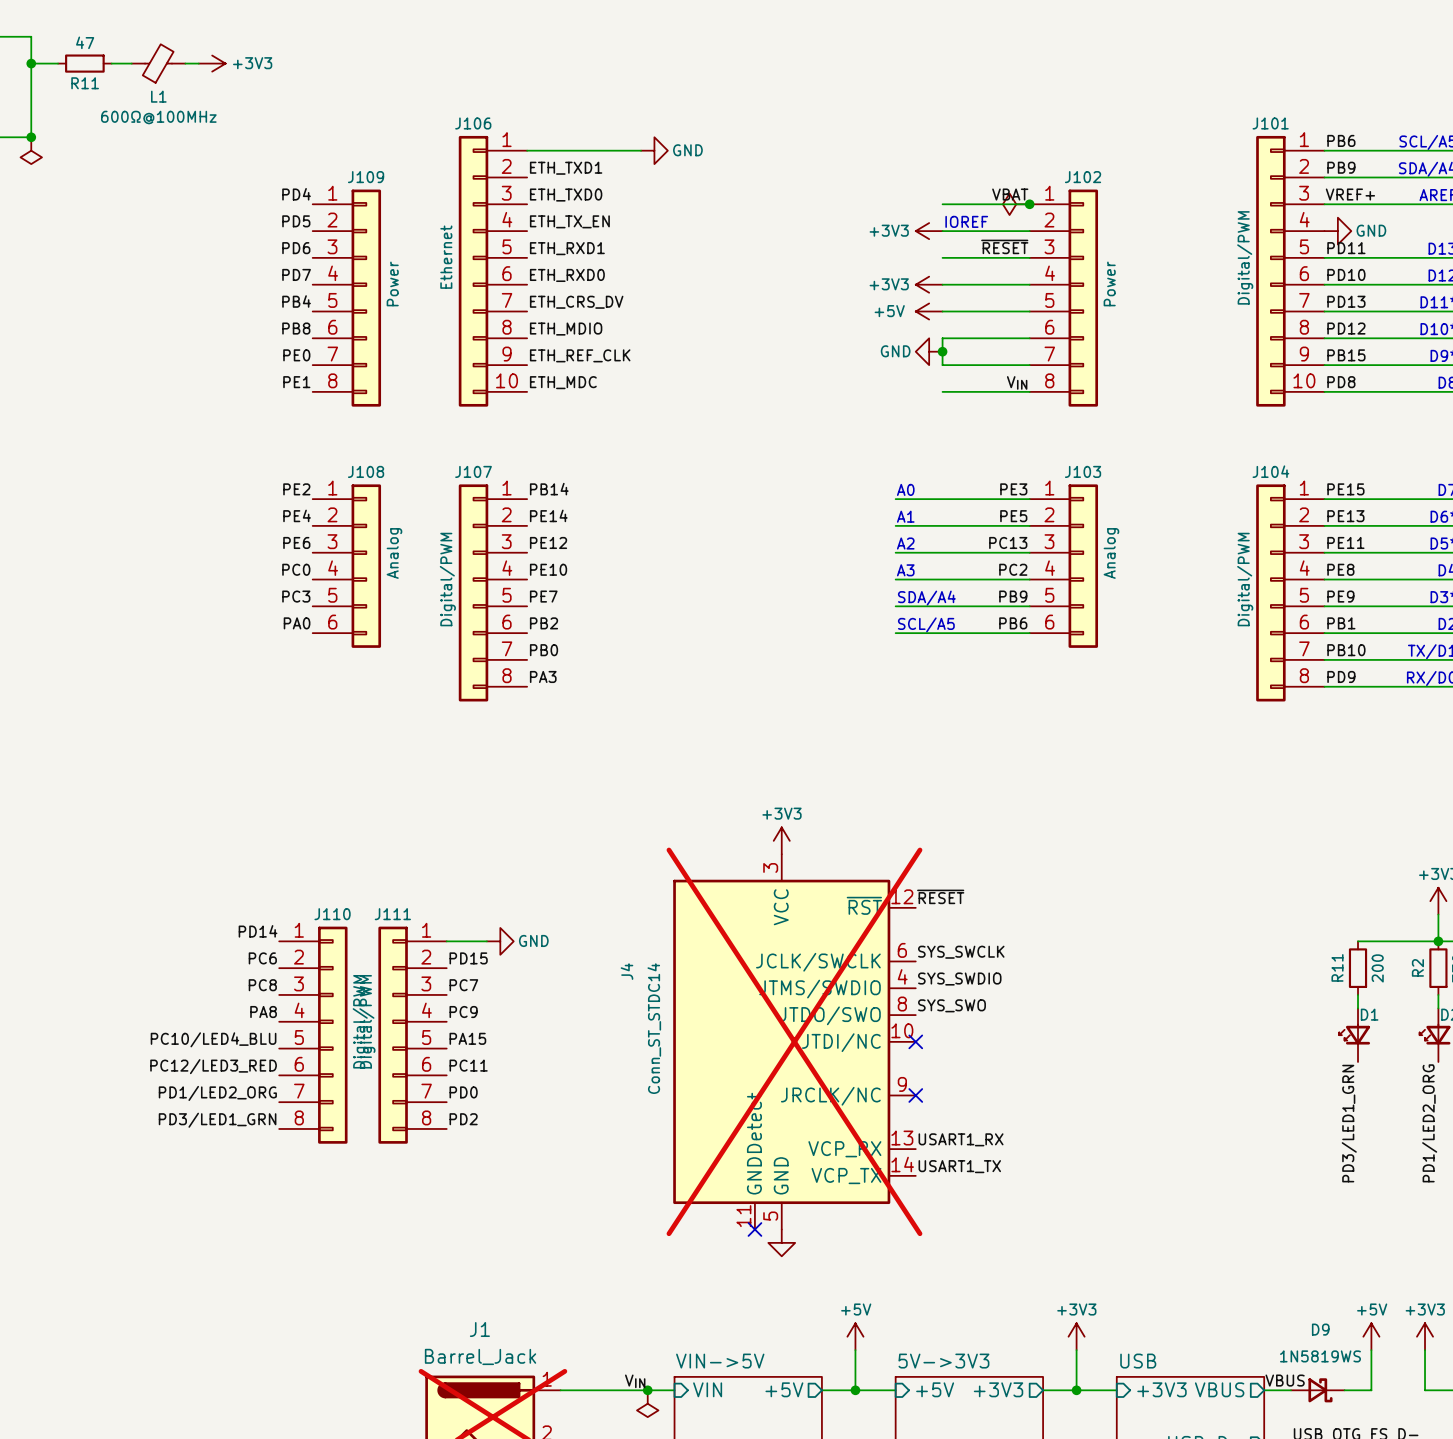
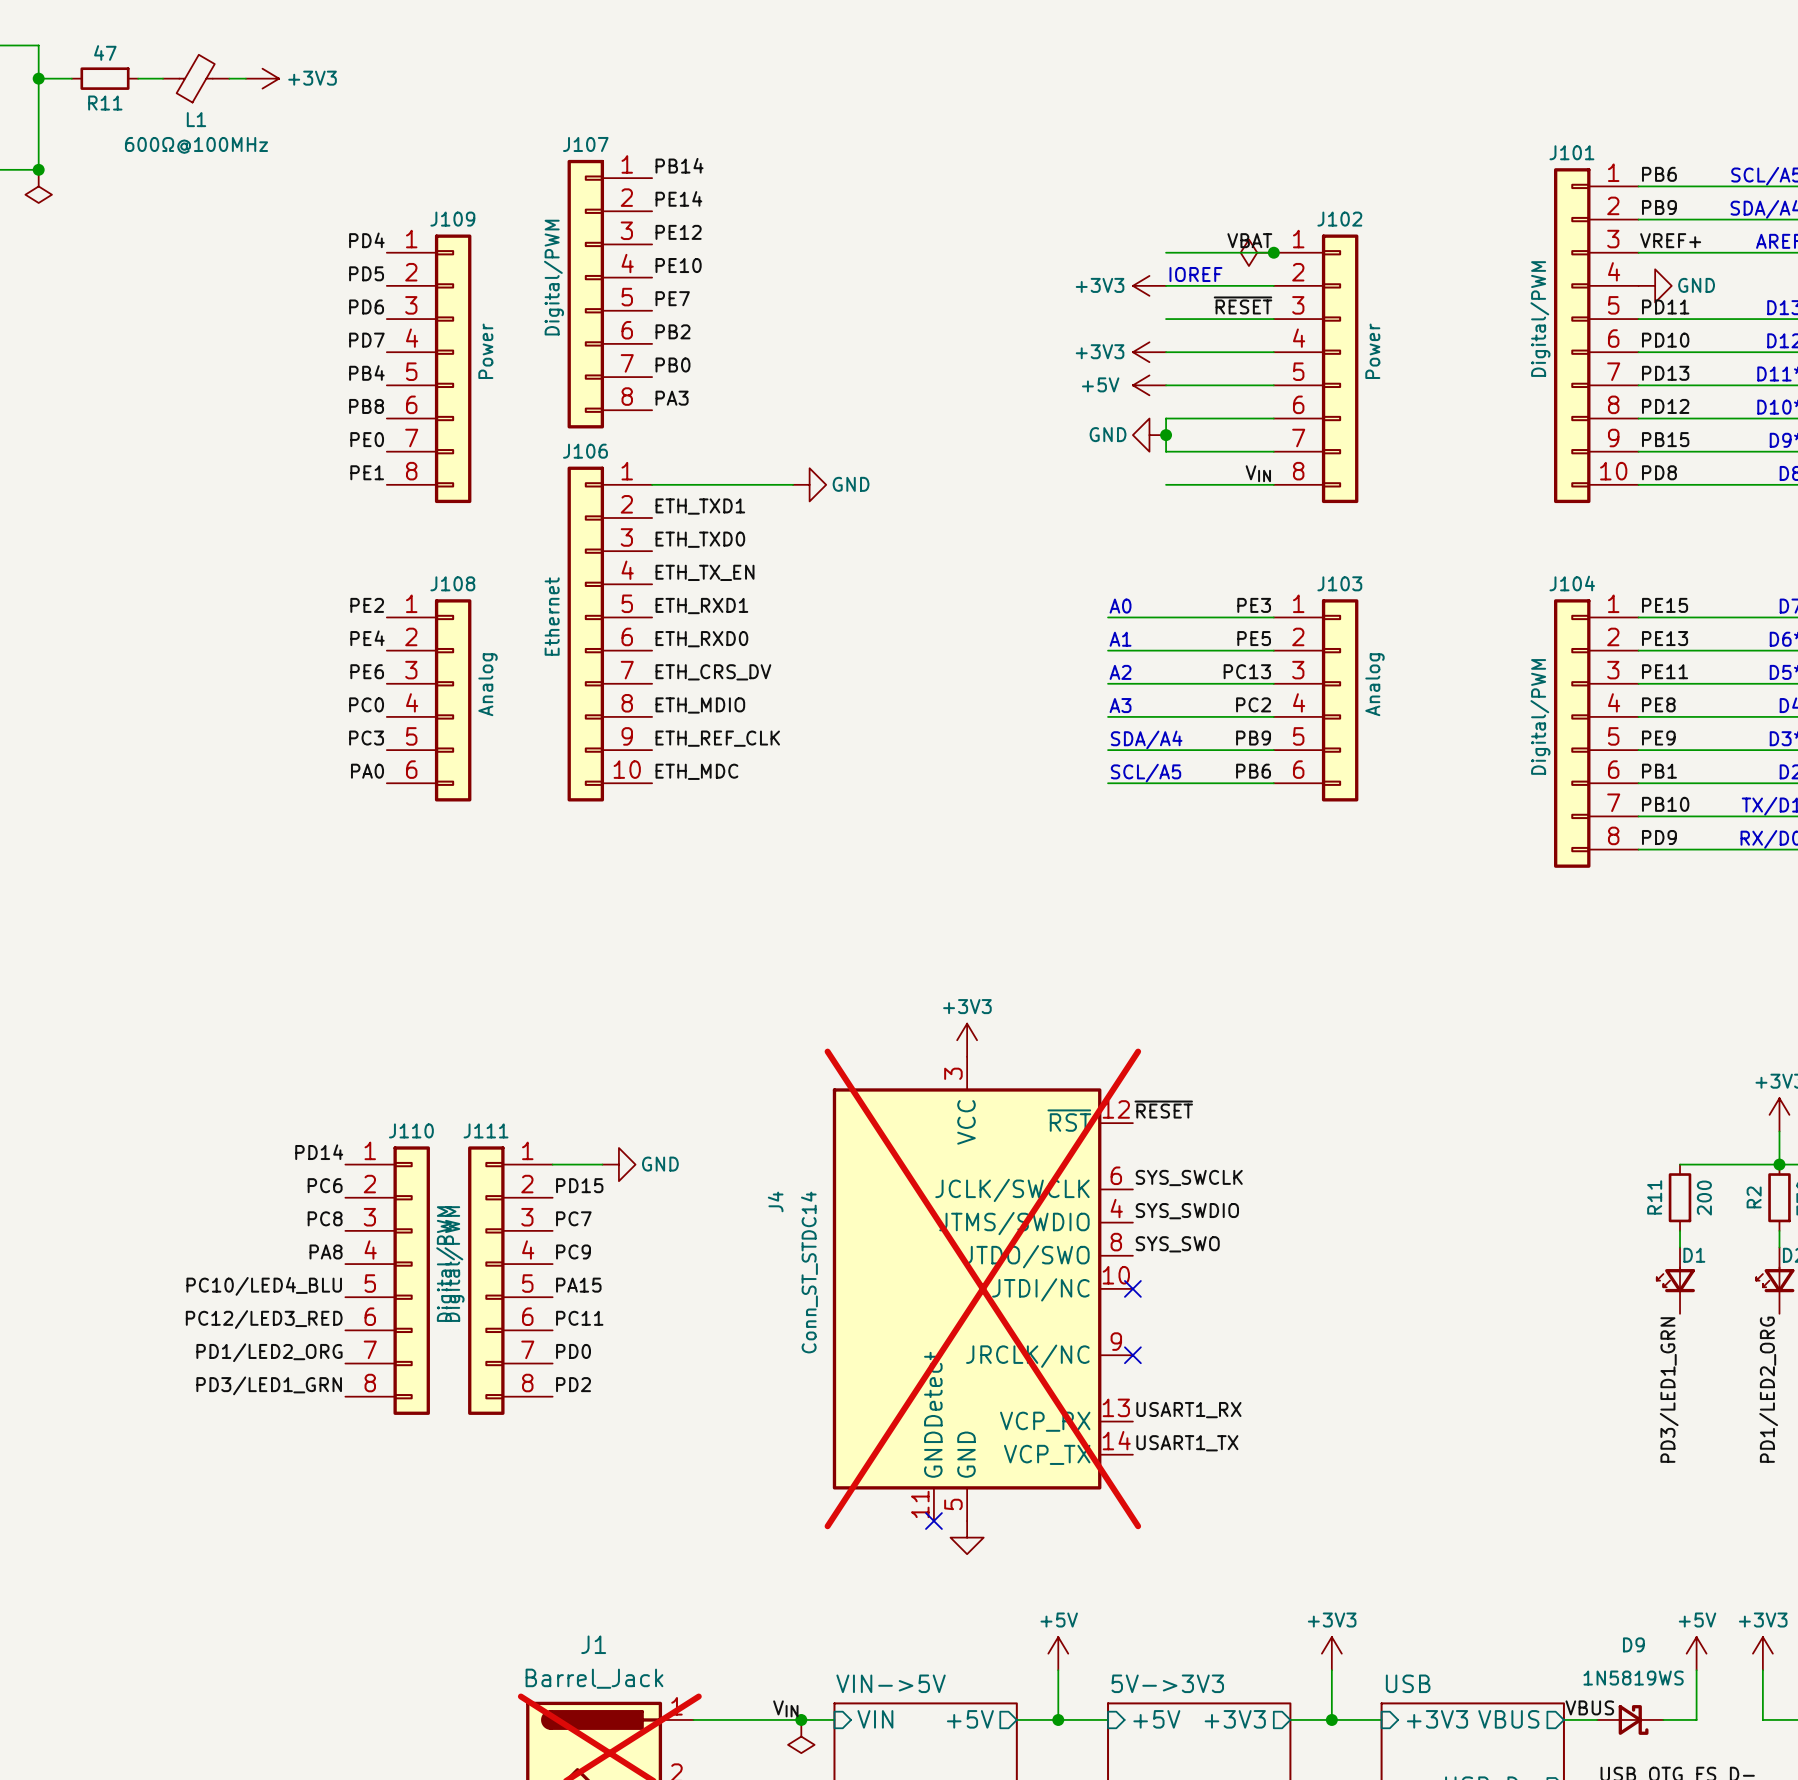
label: none -> PB14 (679, 165)
wire: (527, 150) (641, 150) -> (652, 484) (793, 484)
power symbol position: GND (654, 150) -> GND (809, 484)
label: none -> PE14 (678, 198)
label position: ETH_TXD1 (566, 168) -> ETH_TXD1 (700, 506)
label: none -> PE12 (678, 232)
label position: ETH_TXD0 (566, 195) -> ETH_TXD0 (700, 539)
label: none -> PE10 (678, 265)
label position: ETH_TX_EN (569, 221) -> ETH_TX_EN (705, 572)
label: ETH_RXD1 (567, 248) -> PE7 (672, 298)
J106 position: (492, 271) -> (609, 634)
label: ETH_RXD0 (567, 275) -> PB2 (673, 331)
label: ETH_CRS_DV (576, 302) -> PB0 (673, 365)
label: ETH_MDIO (566, 329) -> PA3 (672, 398)
label: ETH_REF_CLK (580, 355) -> none
label: ETH_MDC (563, 382) -> none
label: PB14 (549, 489) -> ETH_RXD1 (701, 606)
label: PE14 (548, 515) -> ETH_RXD0 (701, 639)
label: PE12 (548, 542) -> ETH_CRS_DV (713, 672)
label: PE10 (548, 569) -> ETH_MDIO (700, 705)
J107 position: (492, 592) -> (609, 294)
label: PE7 (543, 596) -> ETH_REF_CLK (717, 738)
label: PB2 (544, 623) -> ETH_MDC (696, 771)
label: PB0 (544, 650) -> none
label: PA3 (543, 676) -> none

